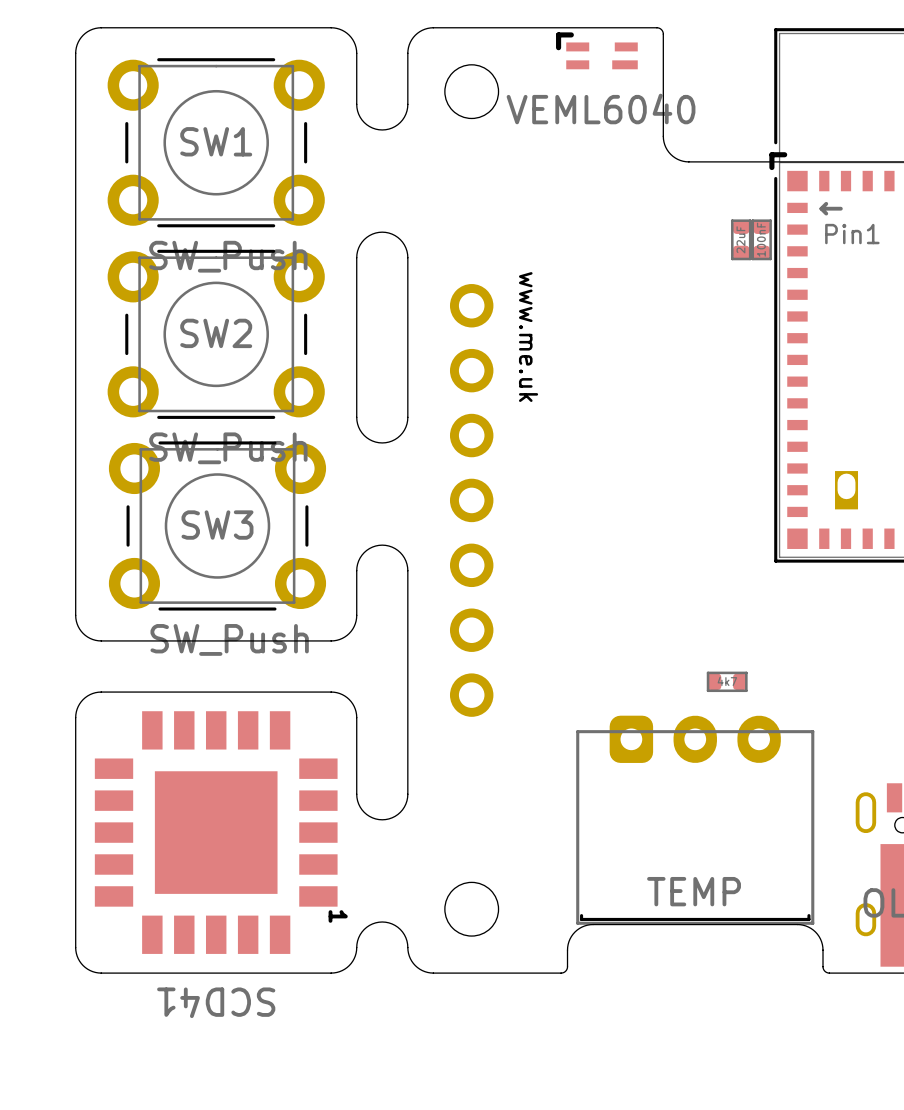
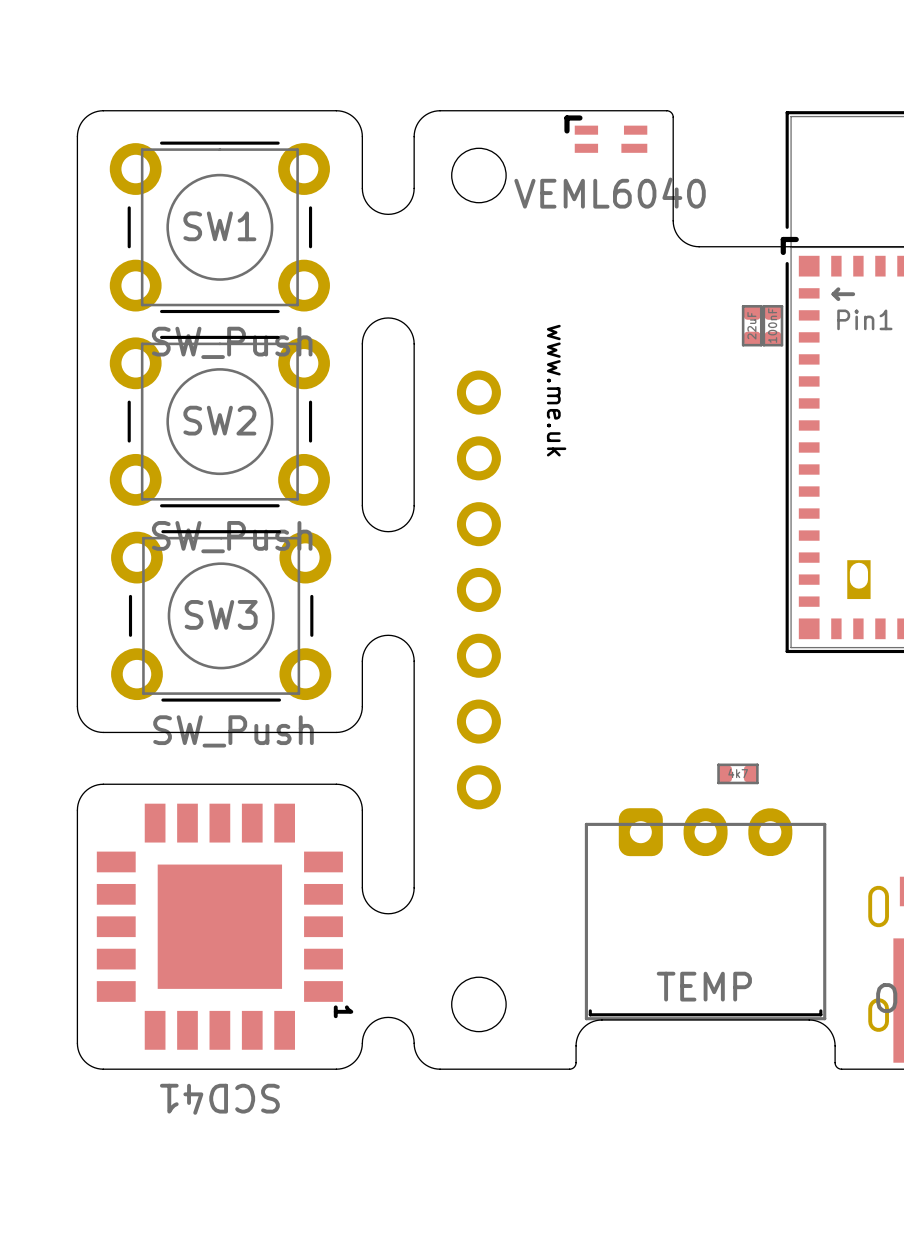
drawing position: (528, 337) -> (556, 390)

